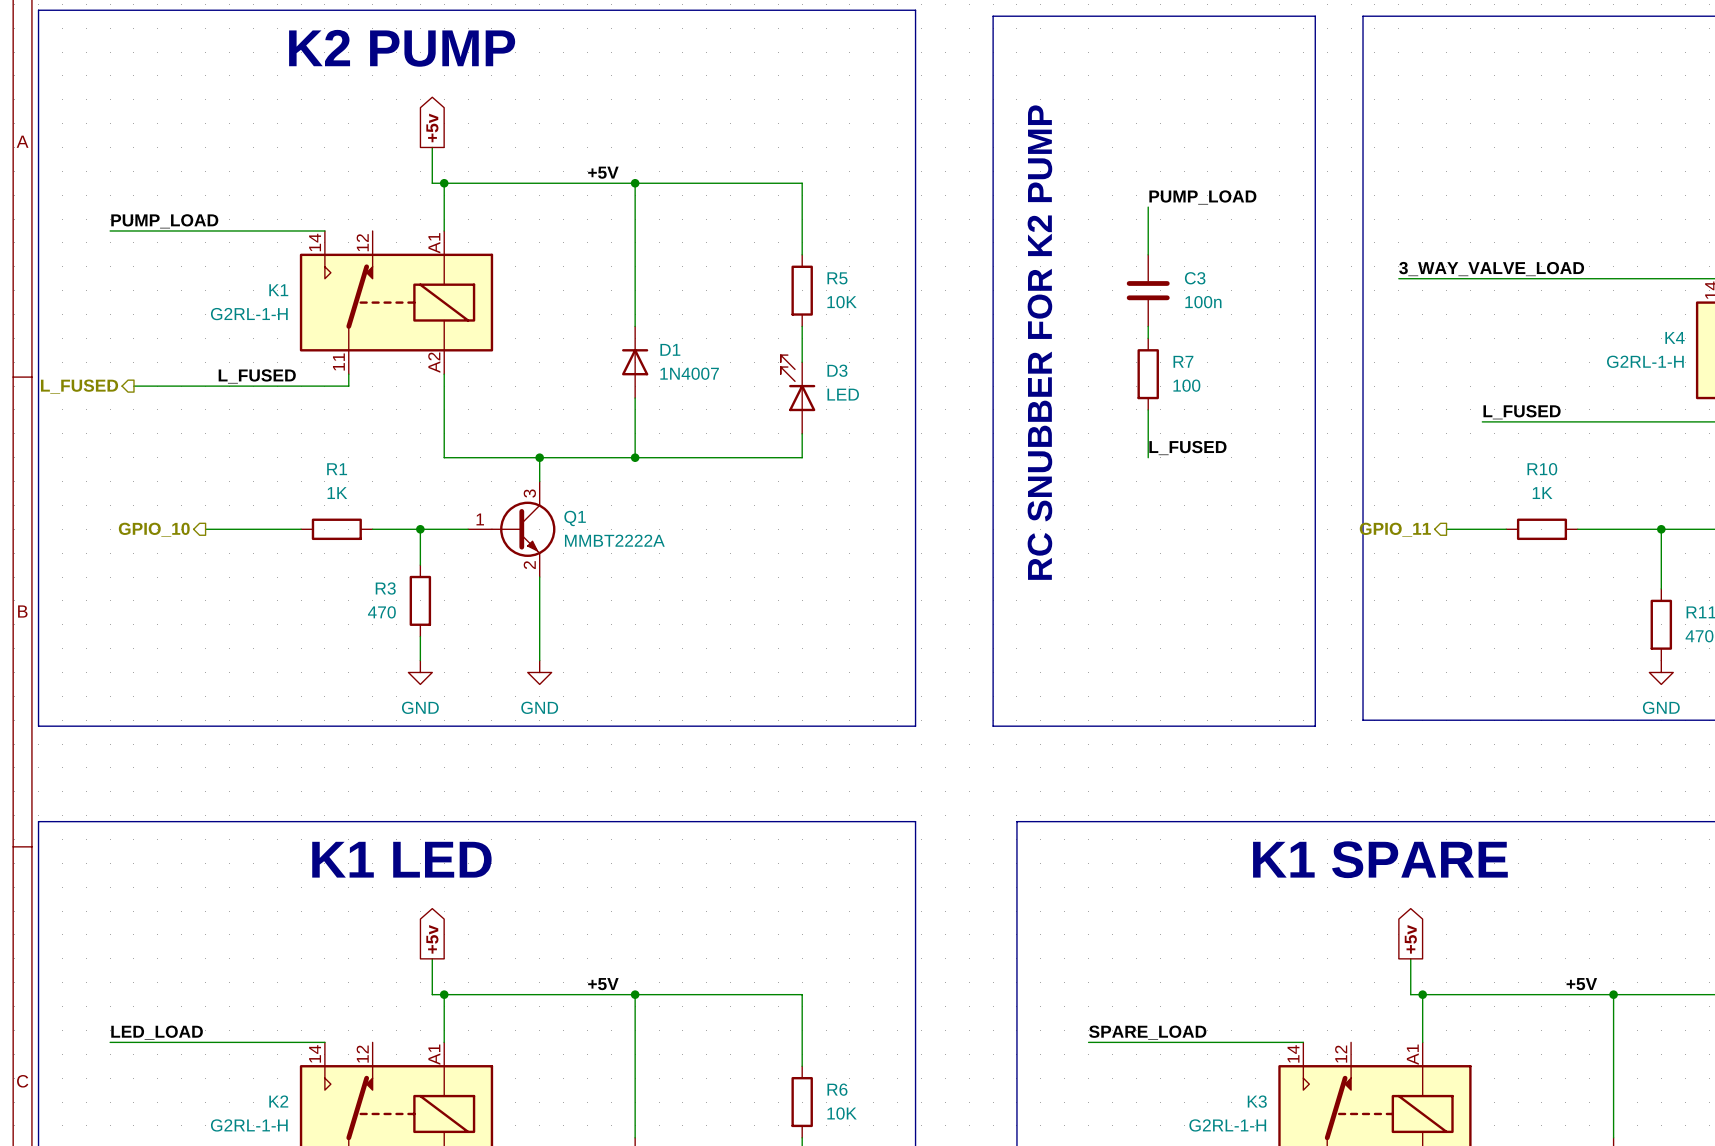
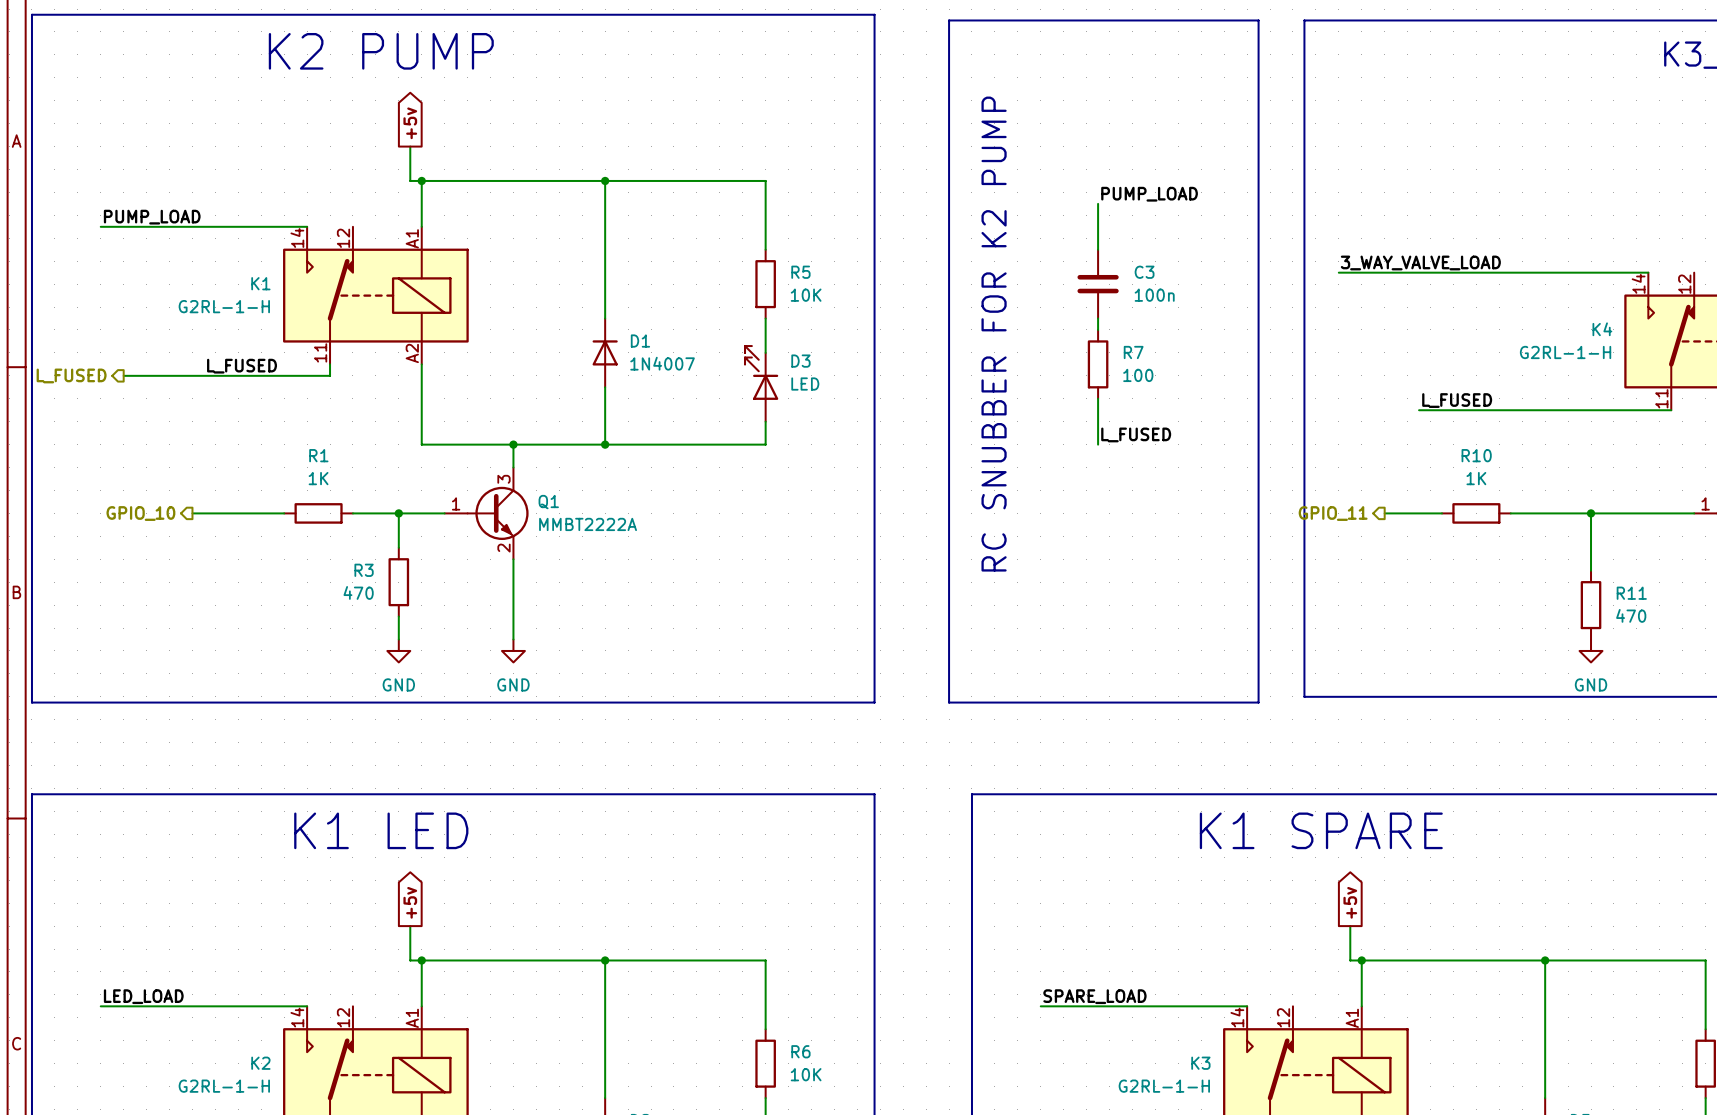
label: +5V (603, 172) -> none
label: +5V (603, 984) -> none
label: +5V (1581, 984) -> none

